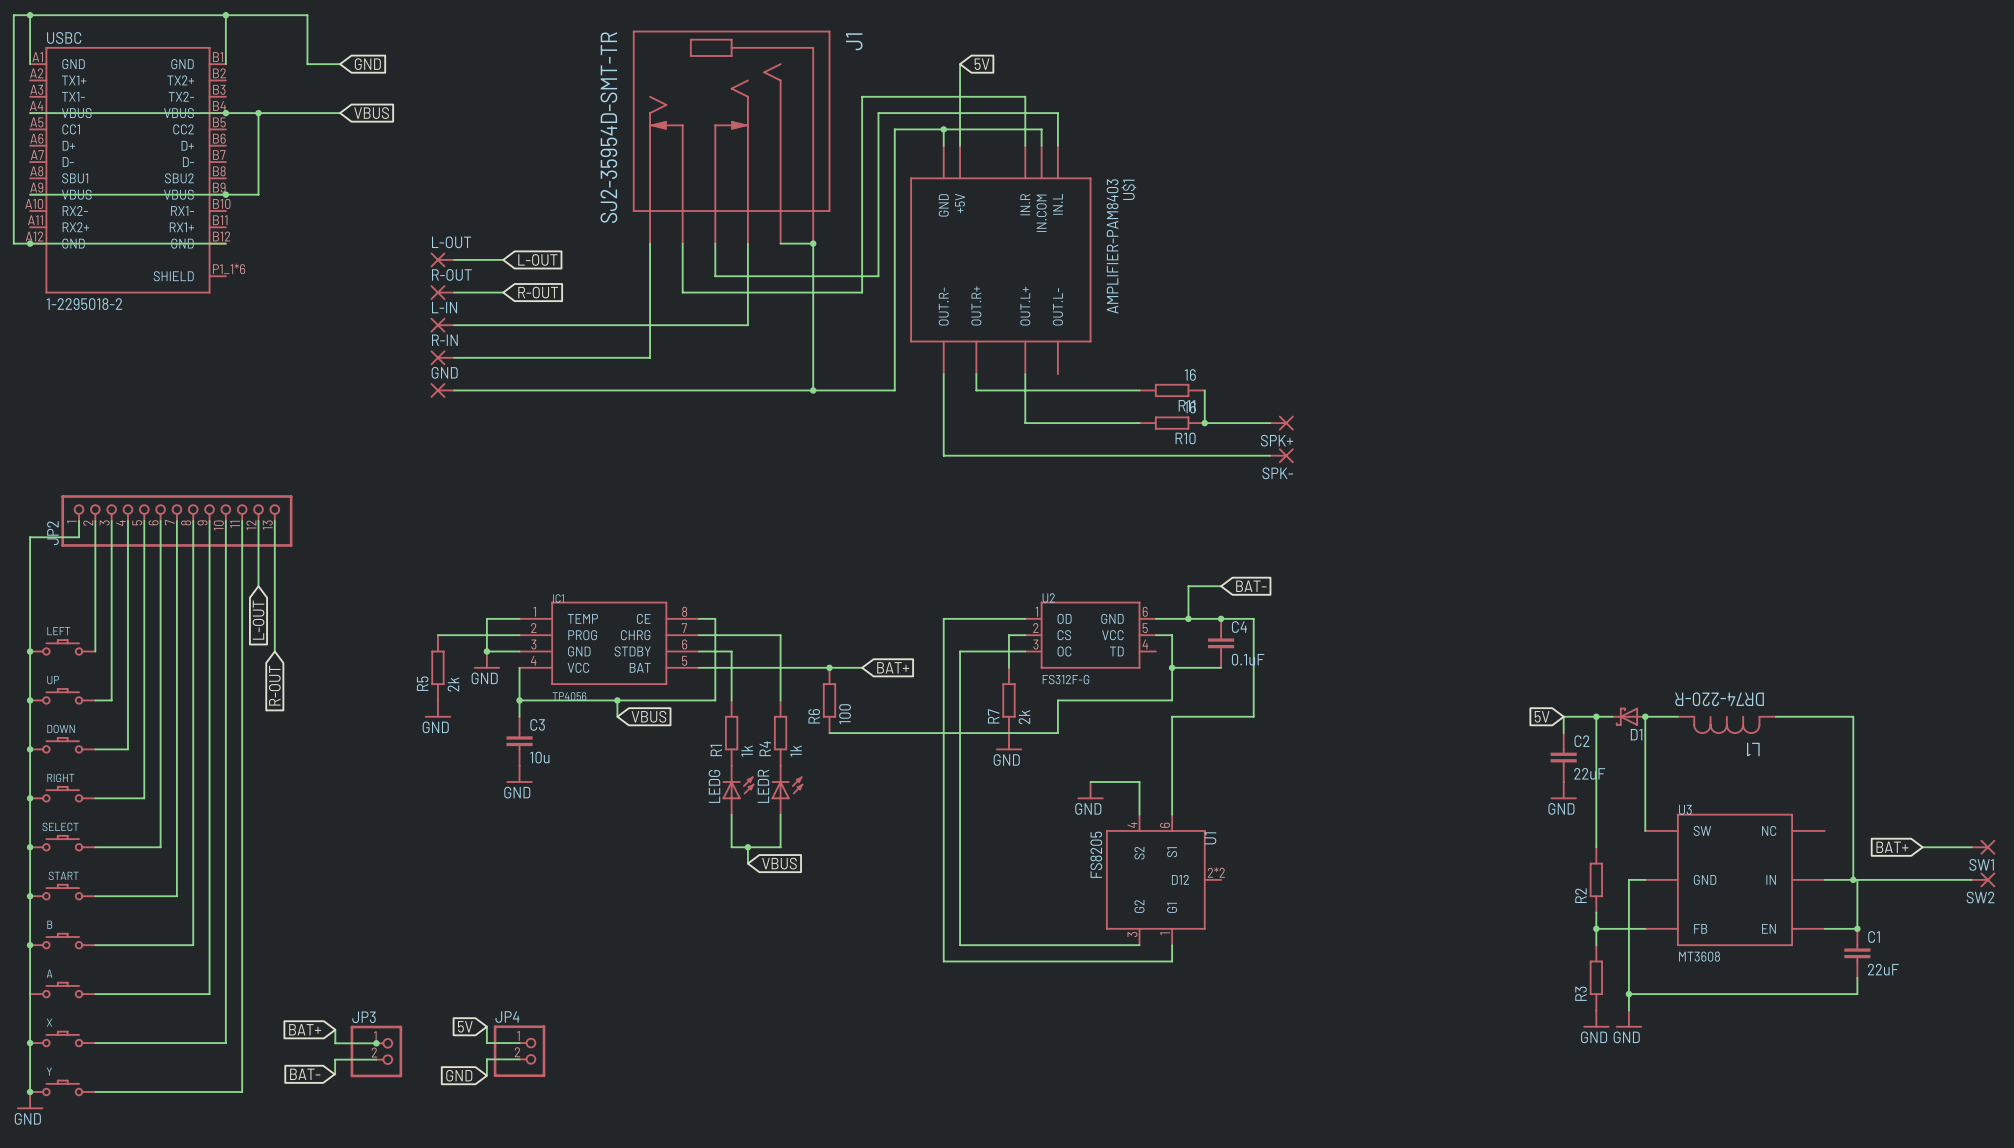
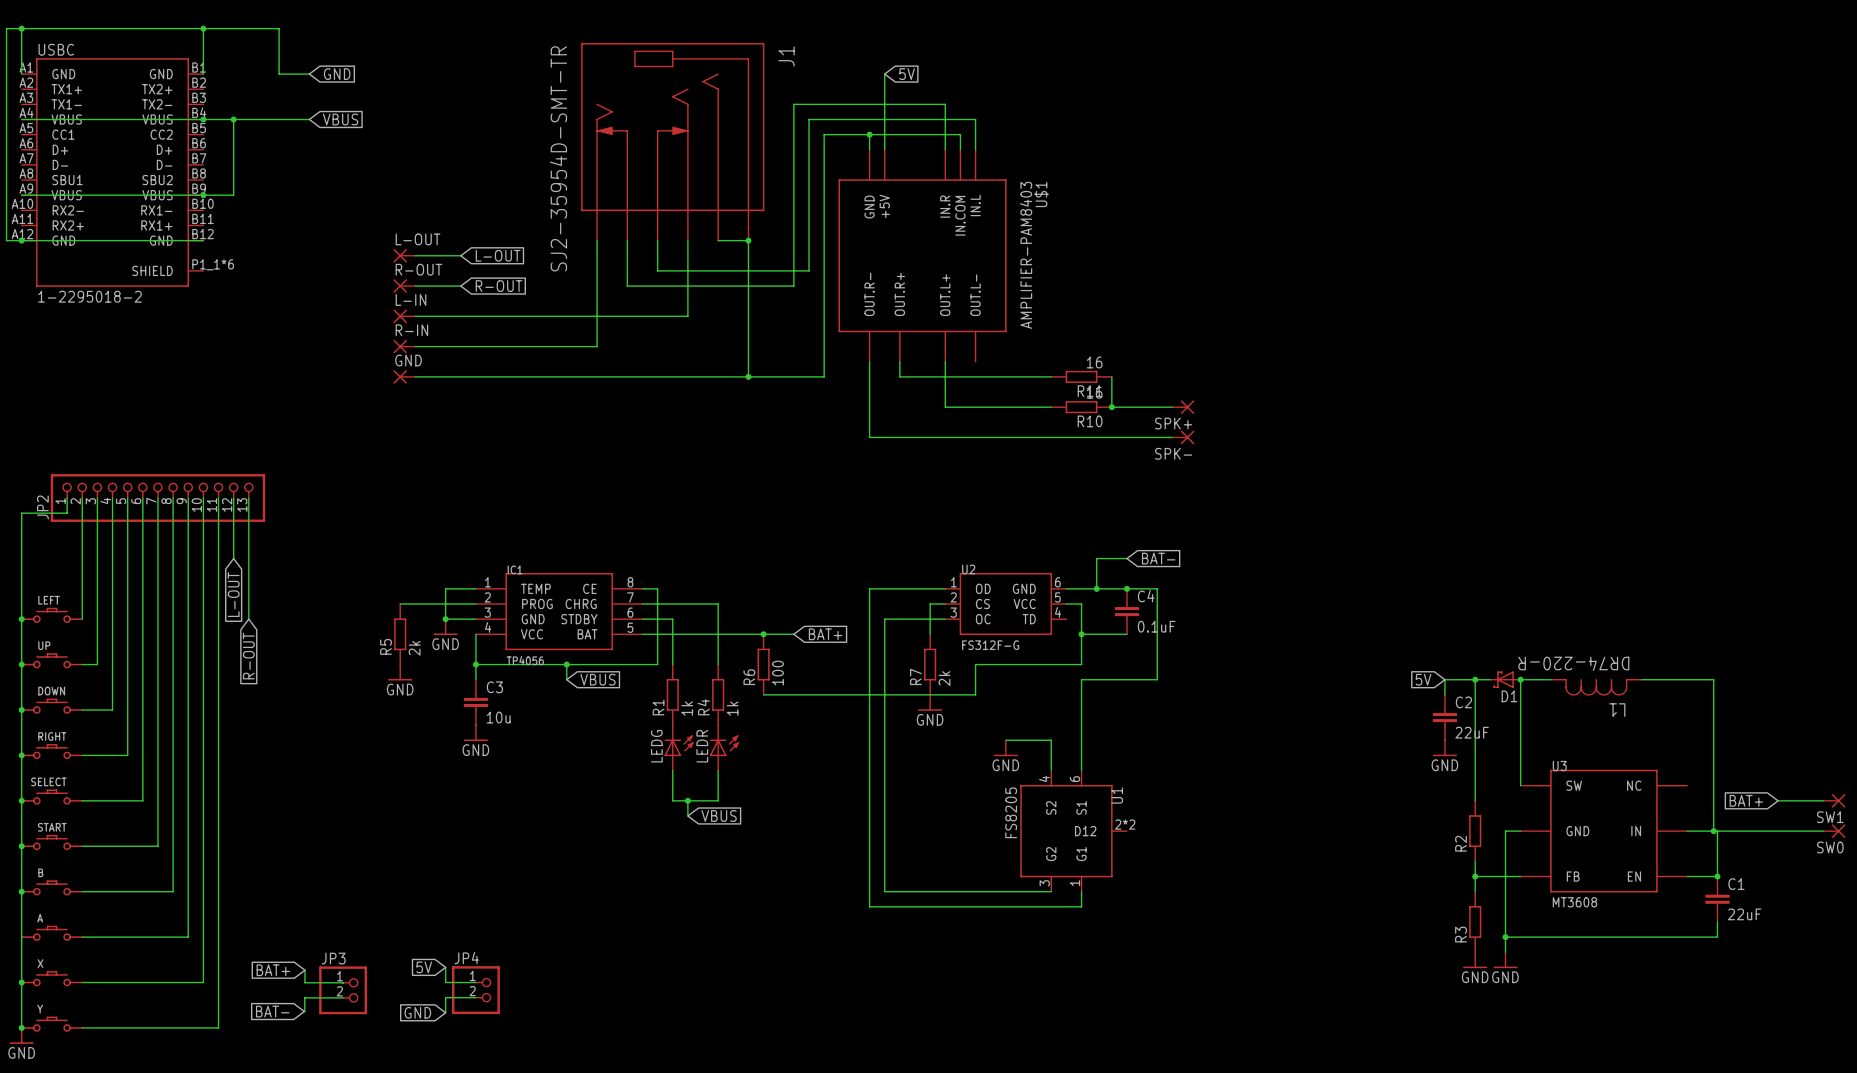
SW2 name: SW2 (1980, 897) -> SW0 (1830, 847)
junction: (376, 1043) -> none

